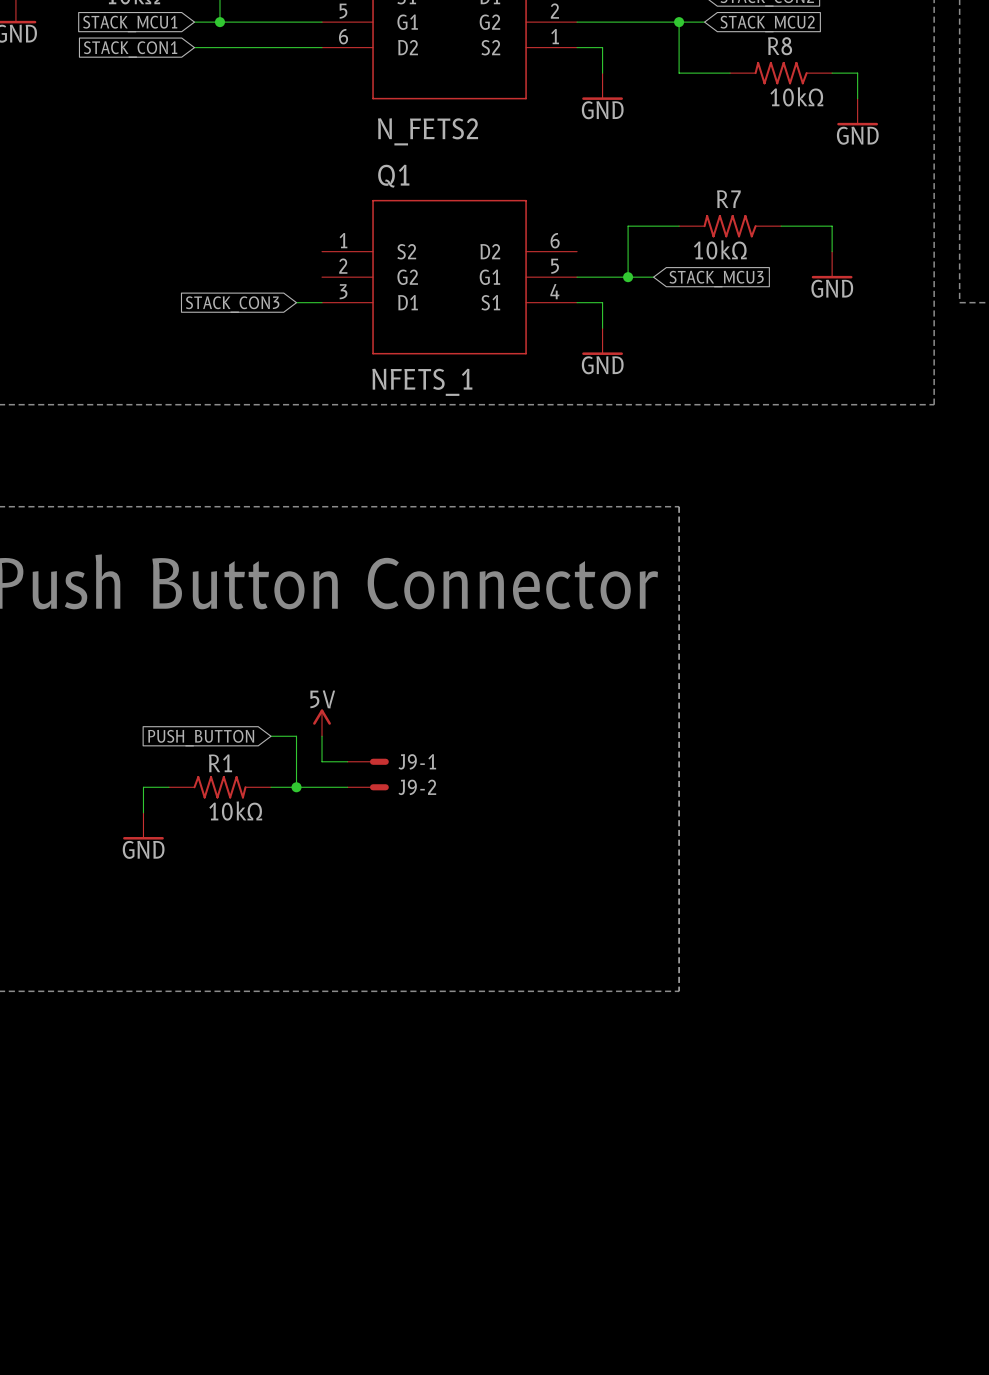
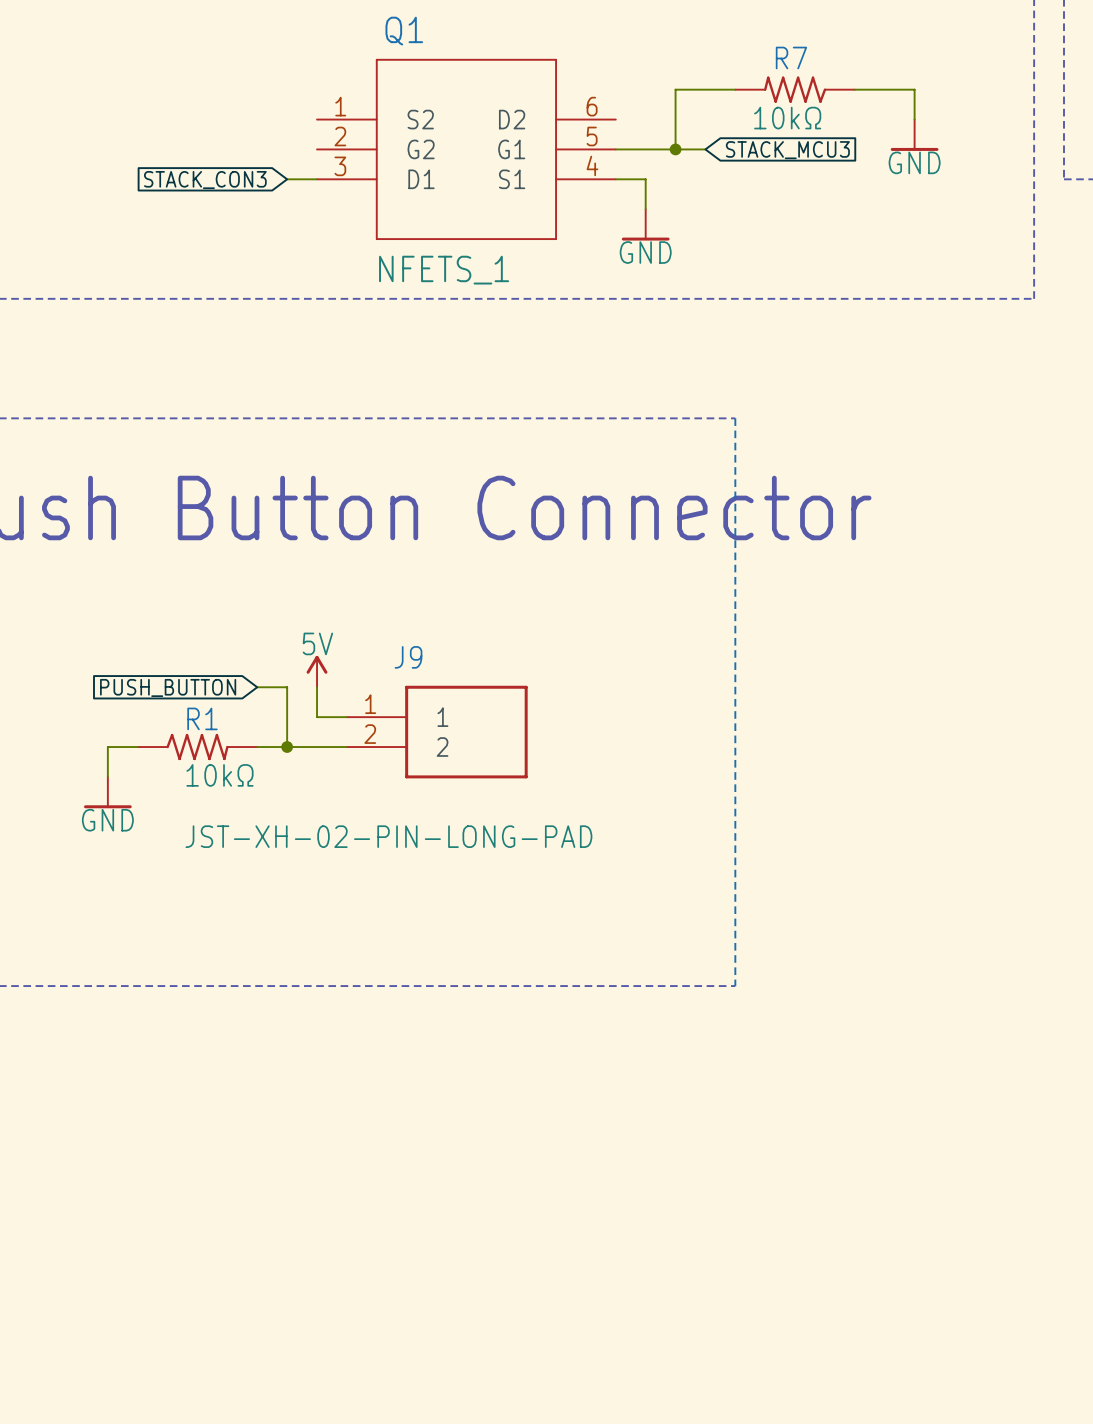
J9-1: (368, 761) -> none
J9: none -> JST-XH-02-PIN-LONG-PAD (437, 732)
J9-2: (368, 787) -> none

